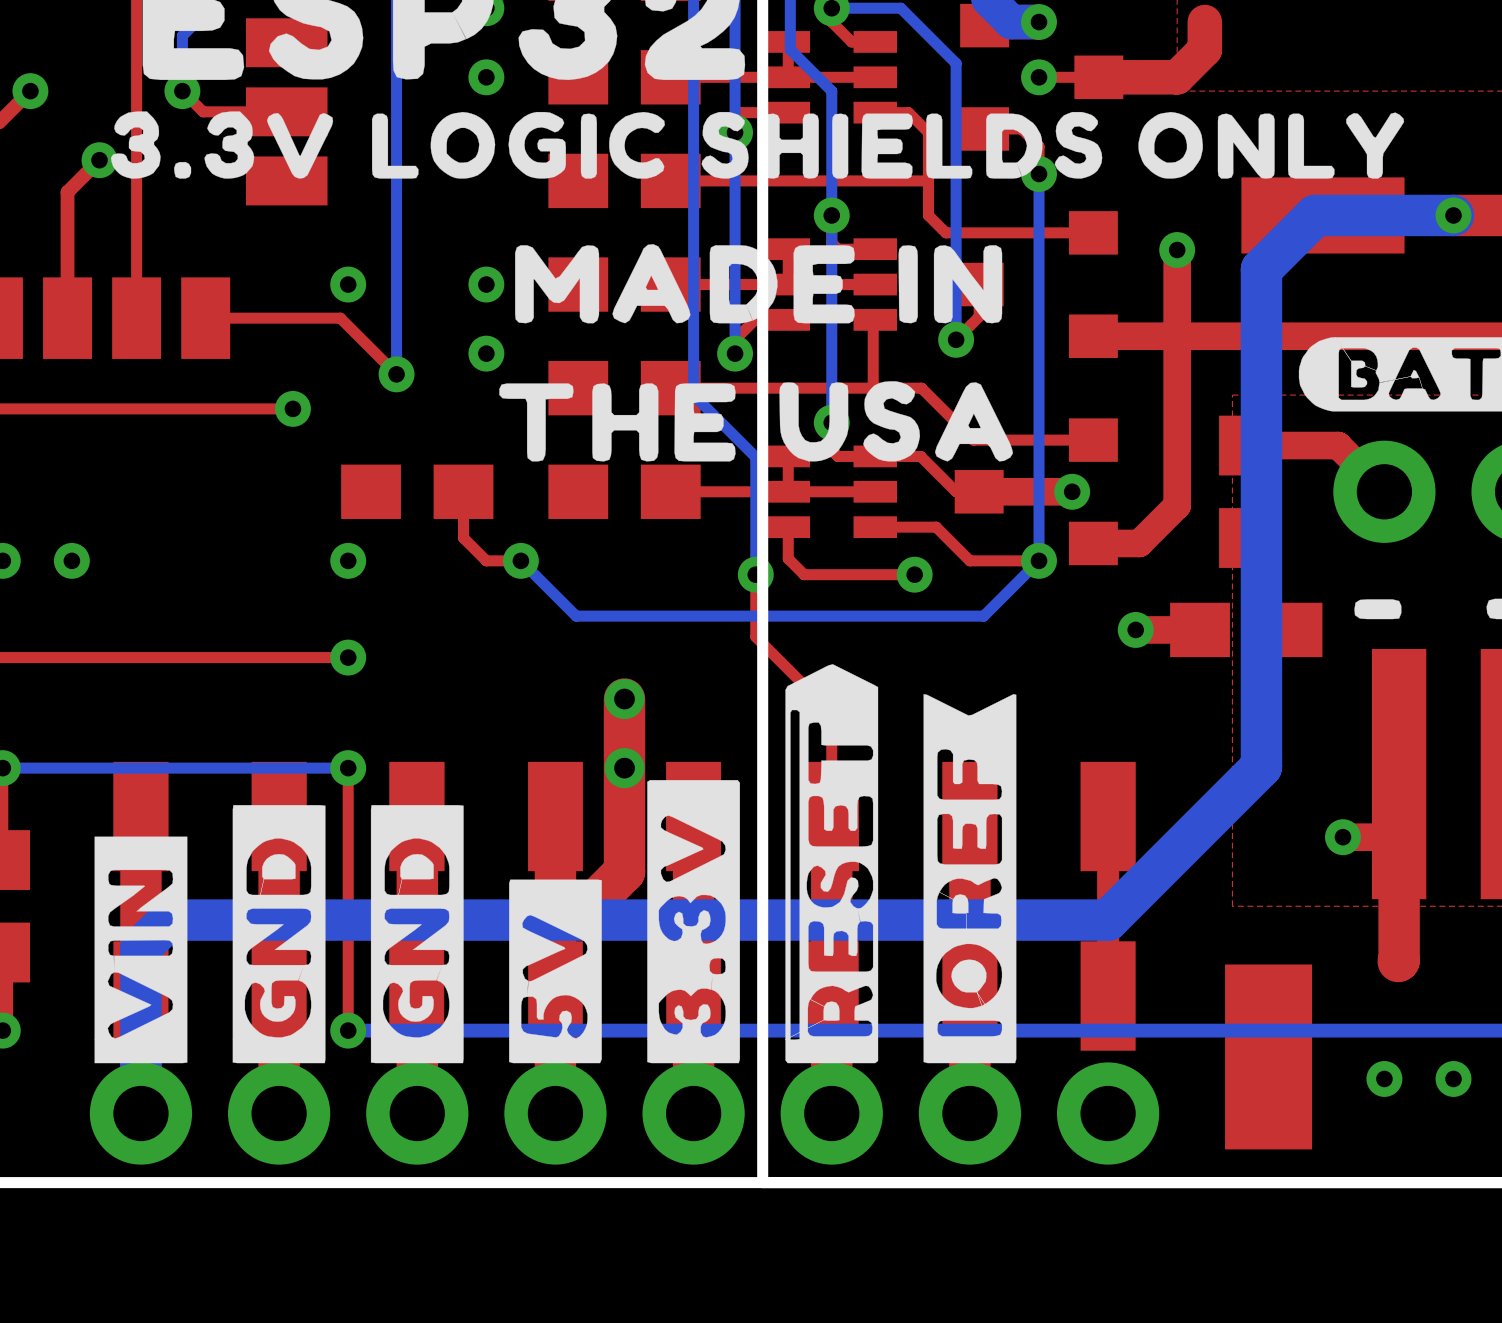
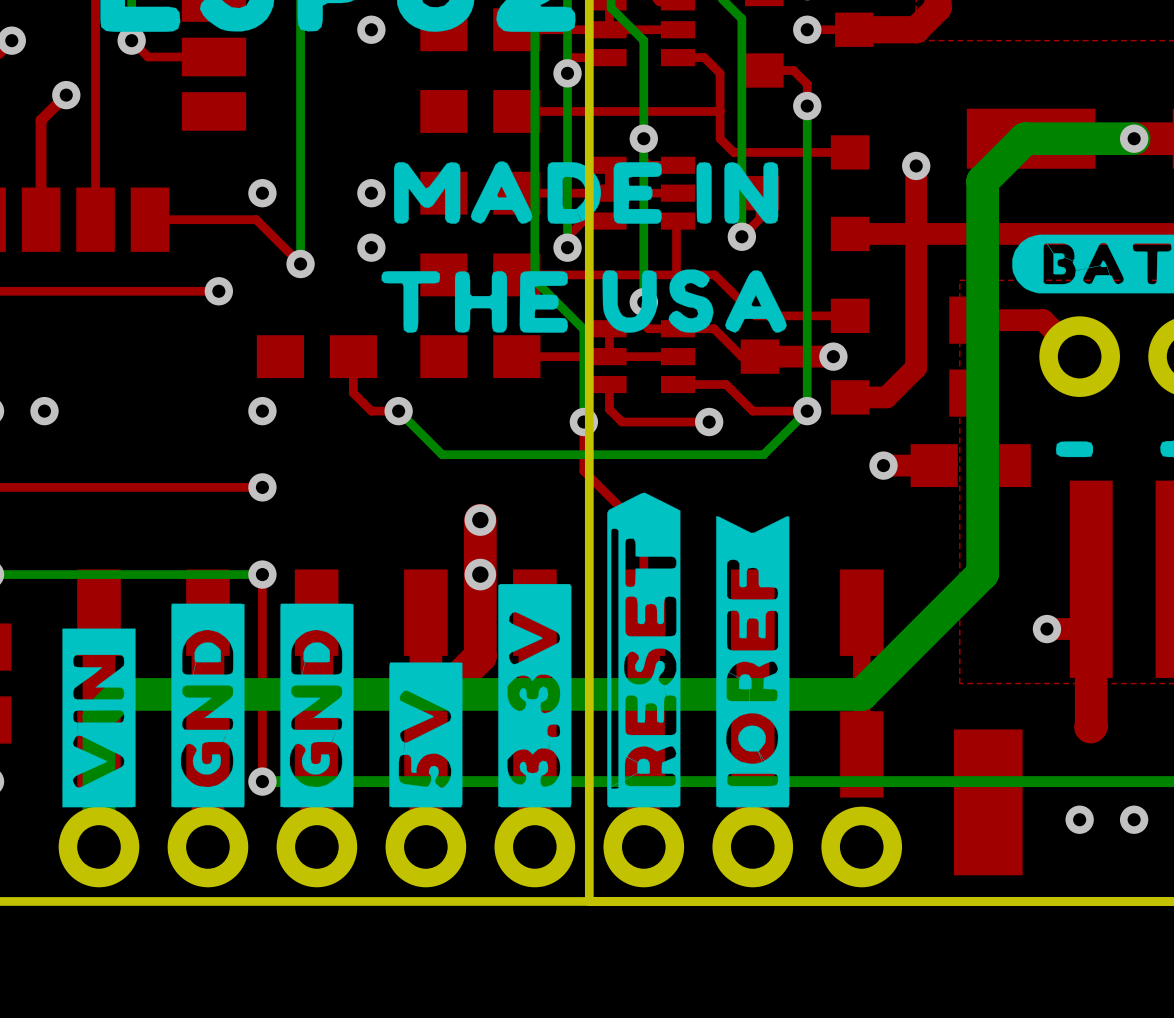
drawing: [110, 111, 1405, 179] -> none

